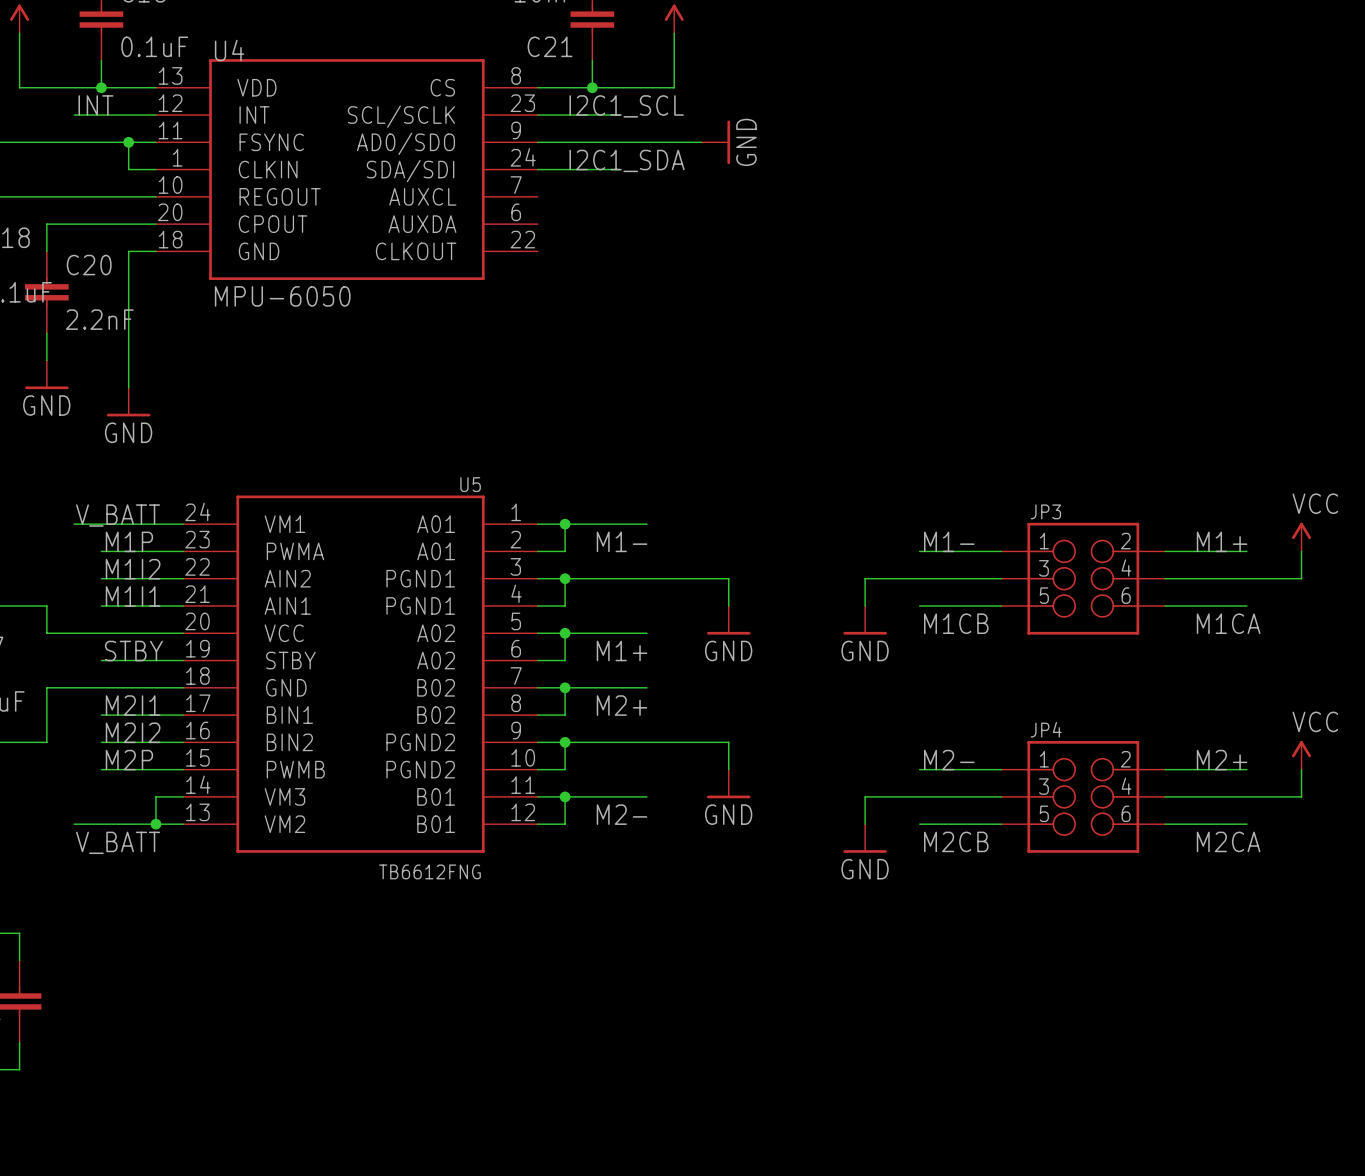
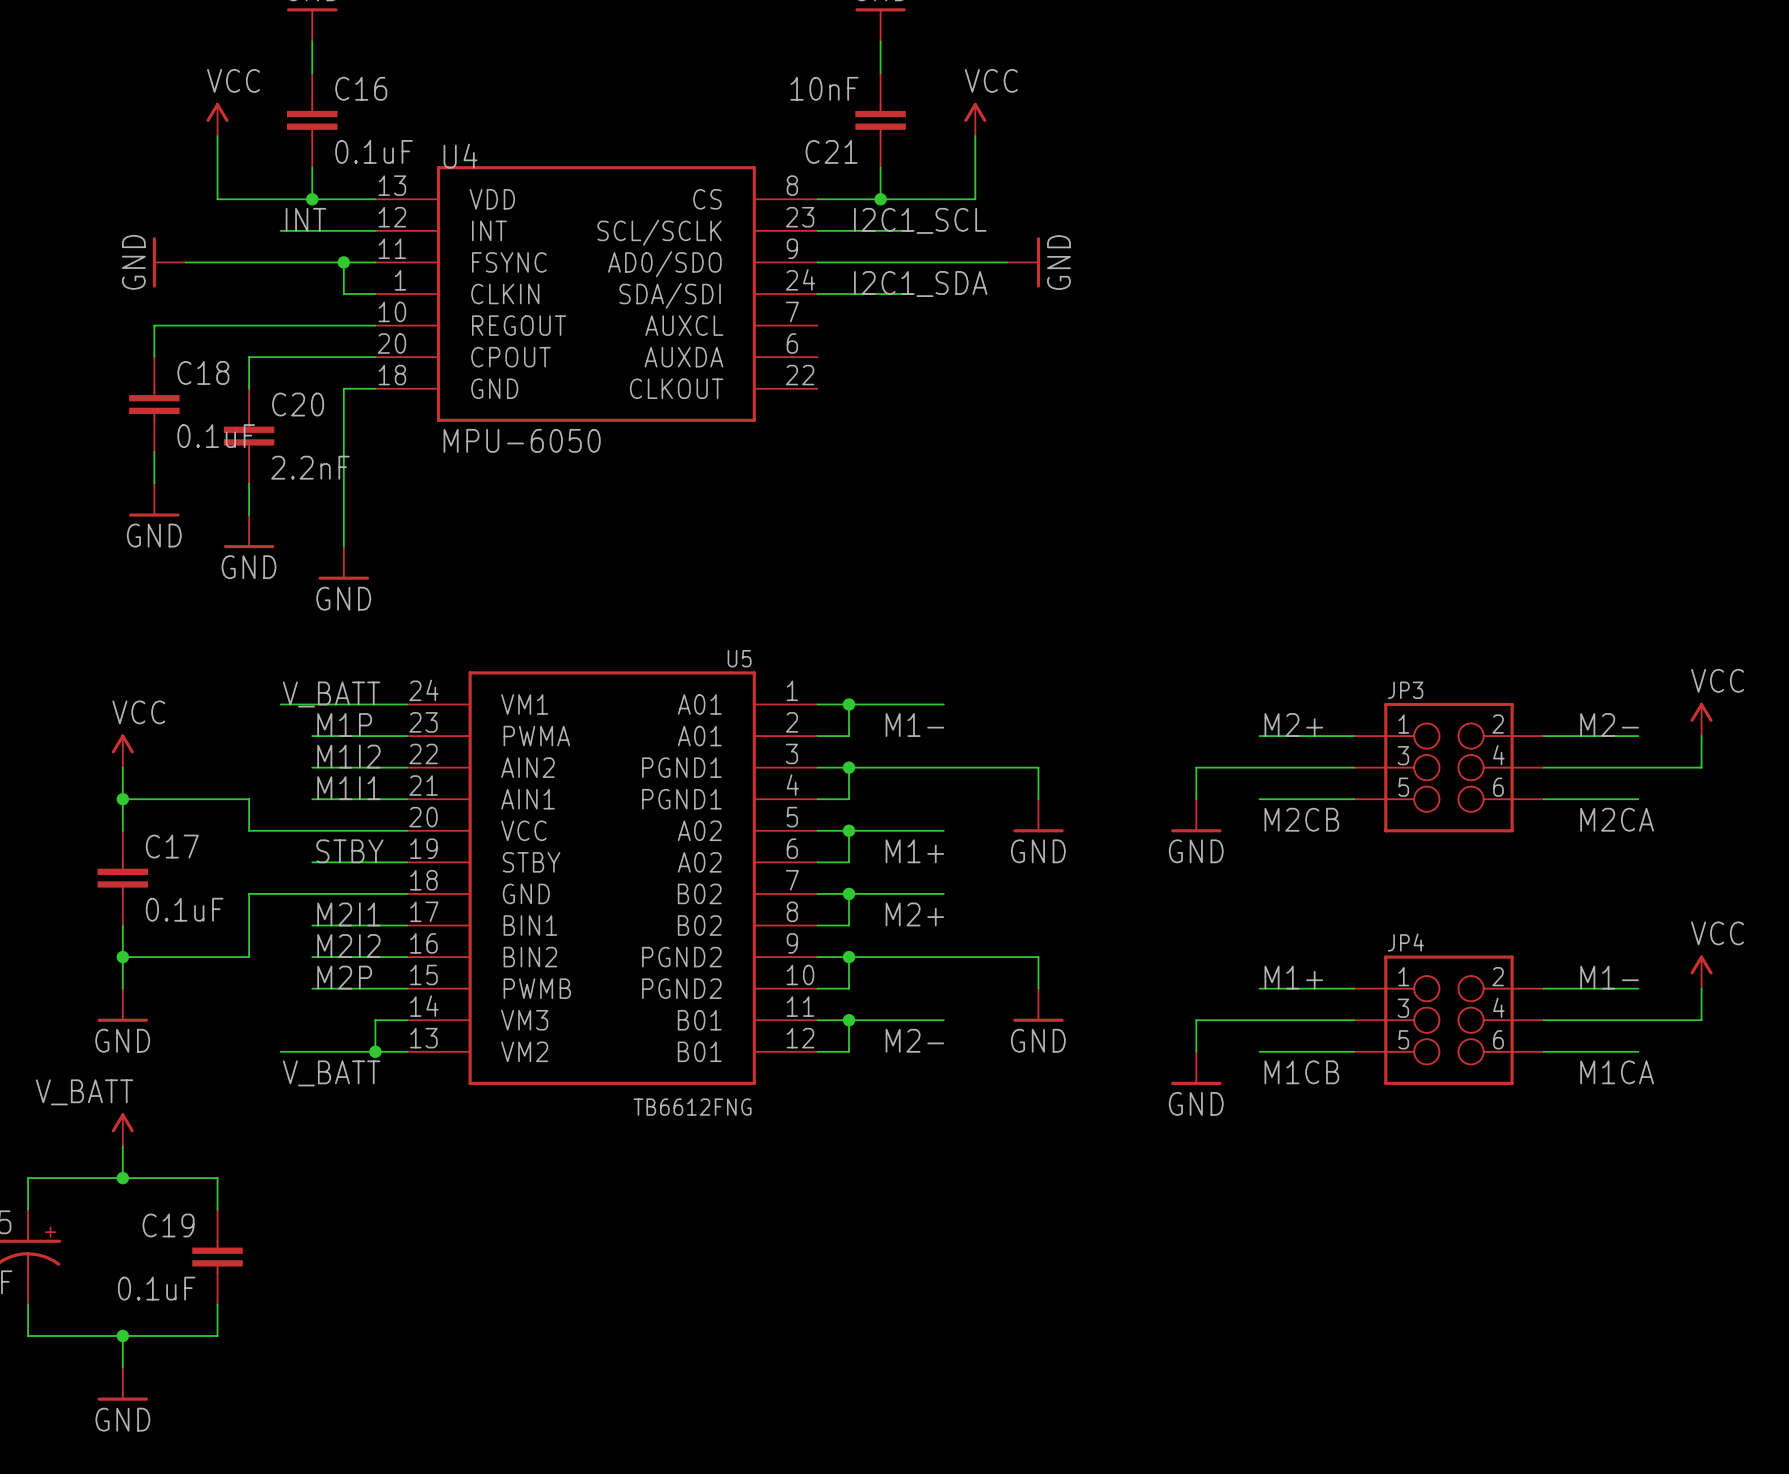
label: M1- (949, 541) -> M2+ (1293, 725)
label: M1+ (1222, 541) -> M2- (1609, 725)
label: M1CB (956, 623) -> M2CB (1301, 819)
label: M1CA (1228, 623) -> M2CA (1617, 819)
label: M2- (949, 760) -> M1+ (1293, 977)
label: M2+ (1222, 760) -> M1- (1609, 977)
label: M2CB (956, 841) -> M1CB (1301, 1072)
label: M2CA (1228, 841) -> M1CA (1617, 1072)

